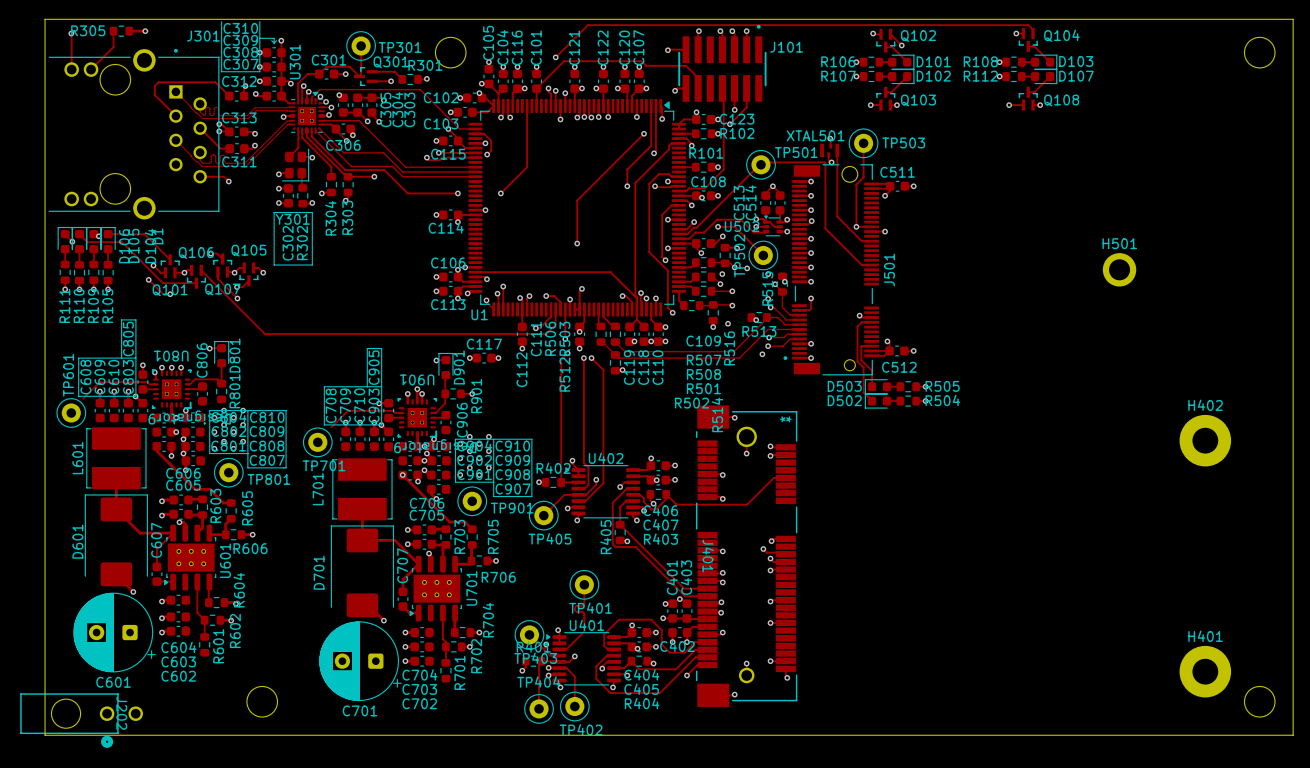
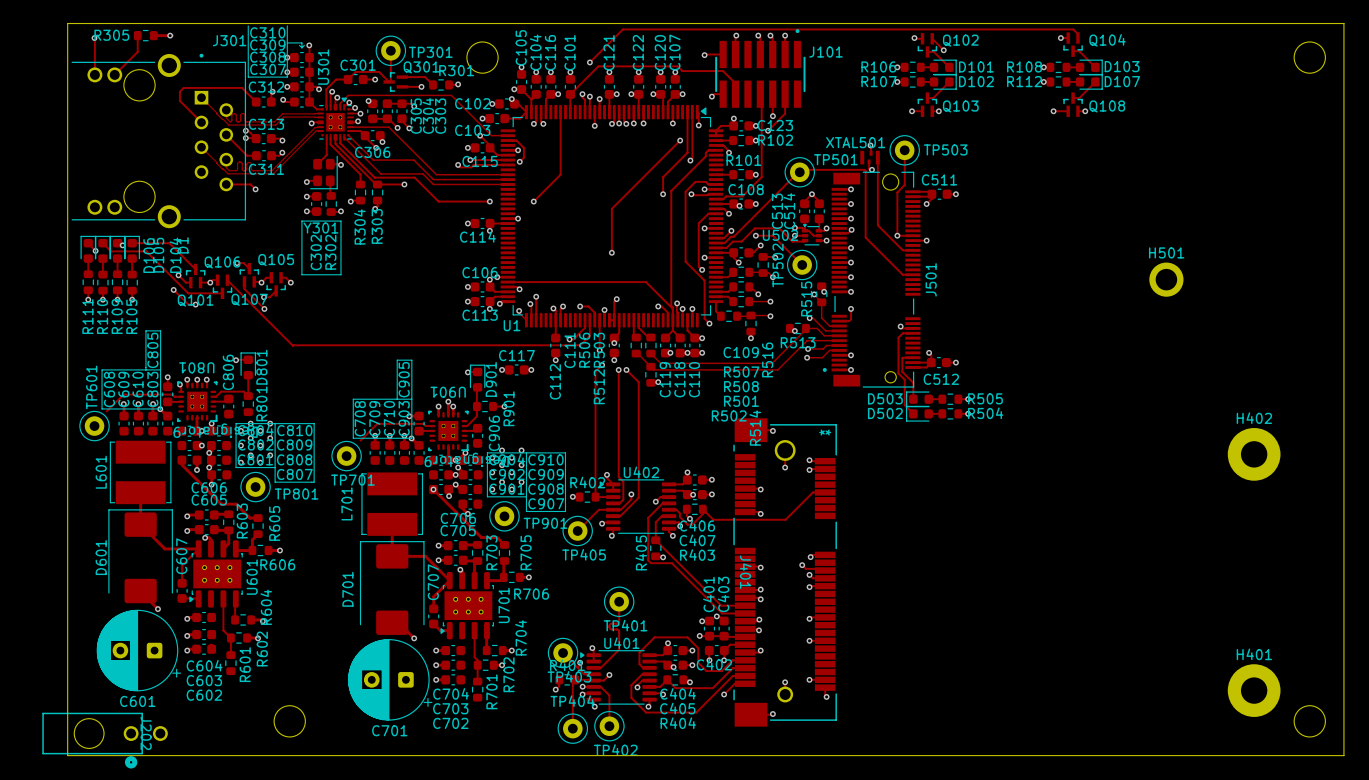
via: (747, 268) -> none
via: (722, 274) -> none
via: (768, 274) -> none
via: (768, 298) -> none
via: (728, 323) -> none
via: (762, 354) -> none

